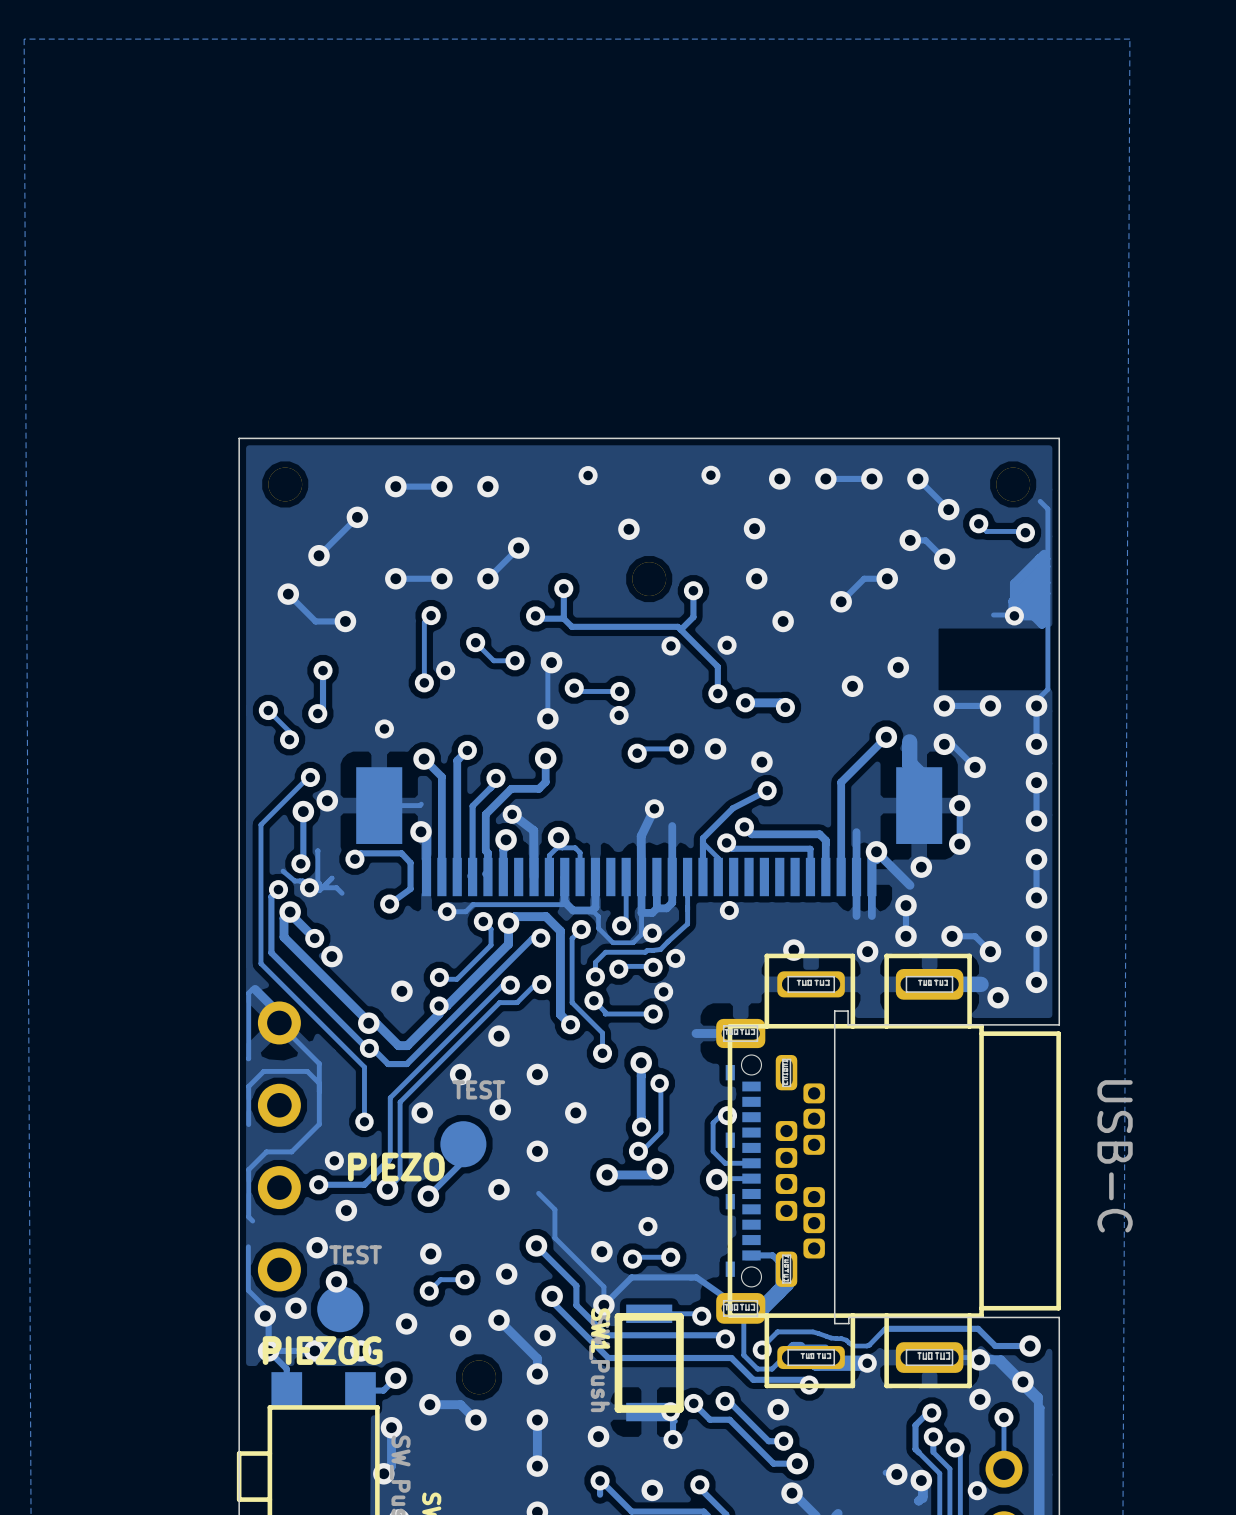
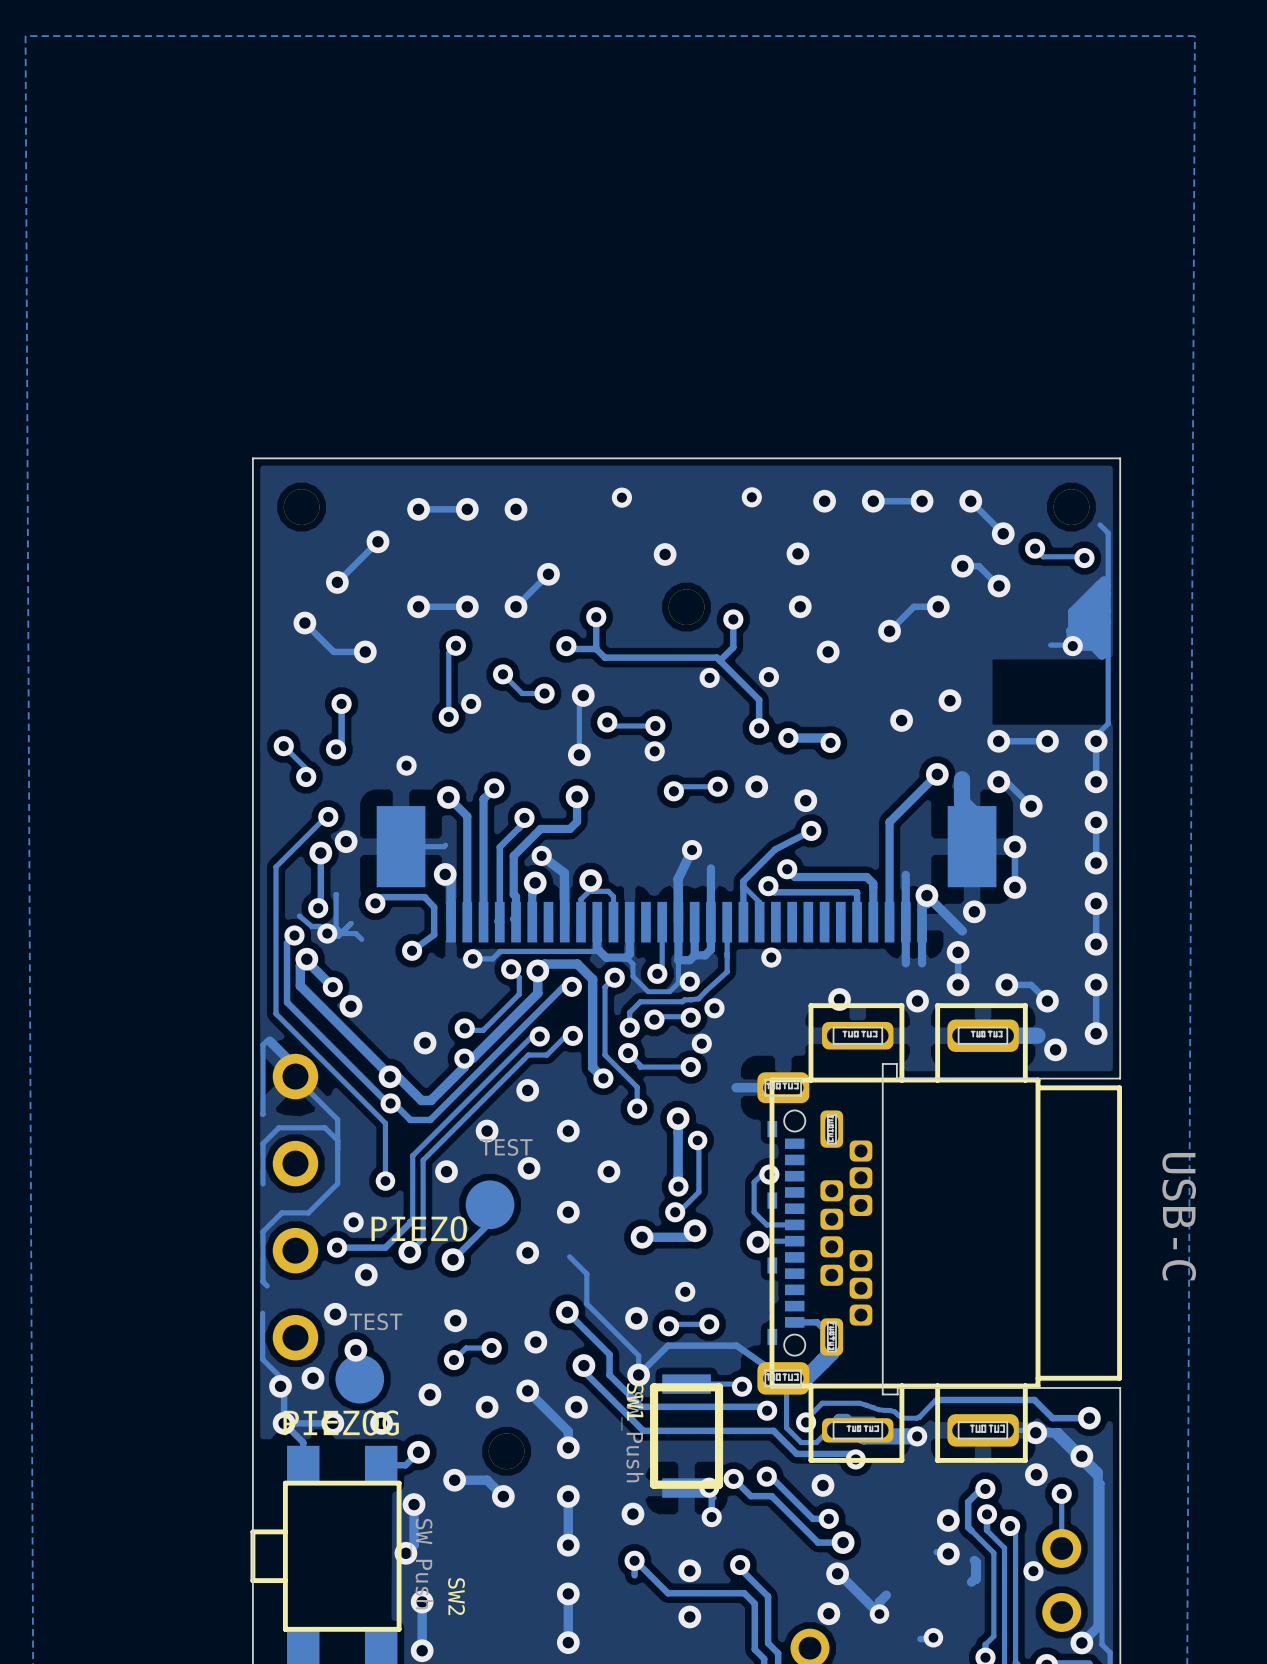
via position: (921, 1480) -> (948, 1520)

